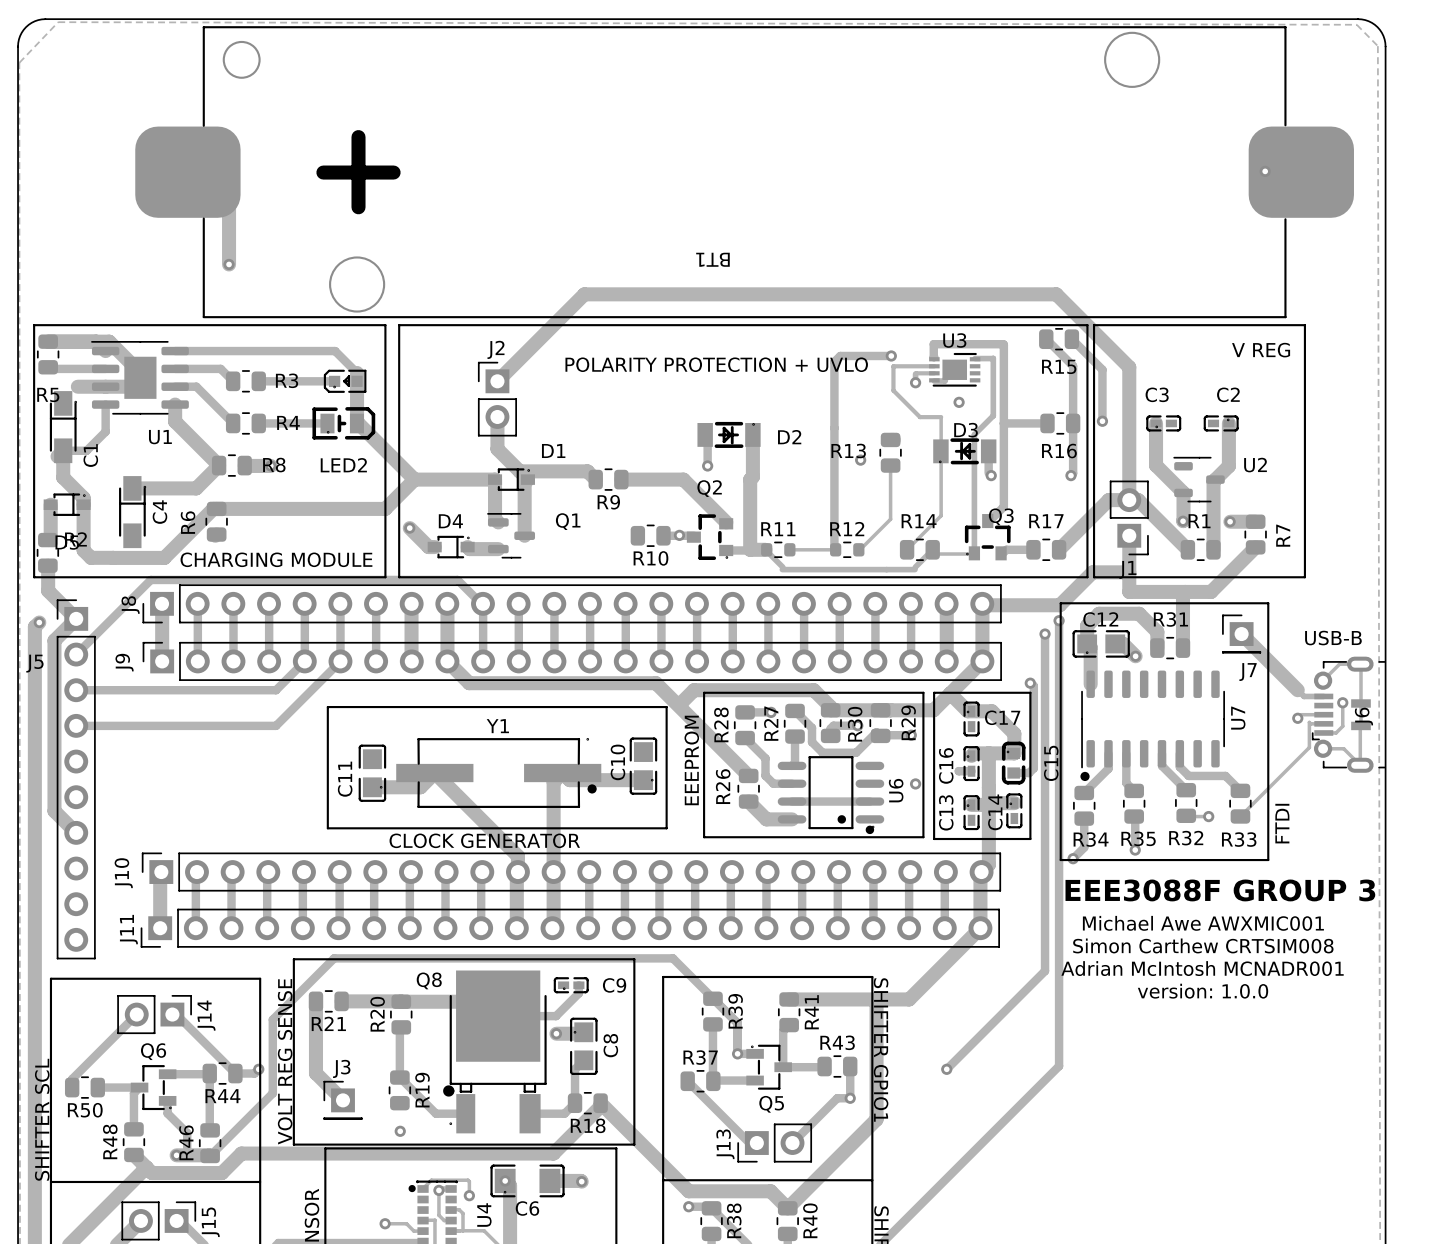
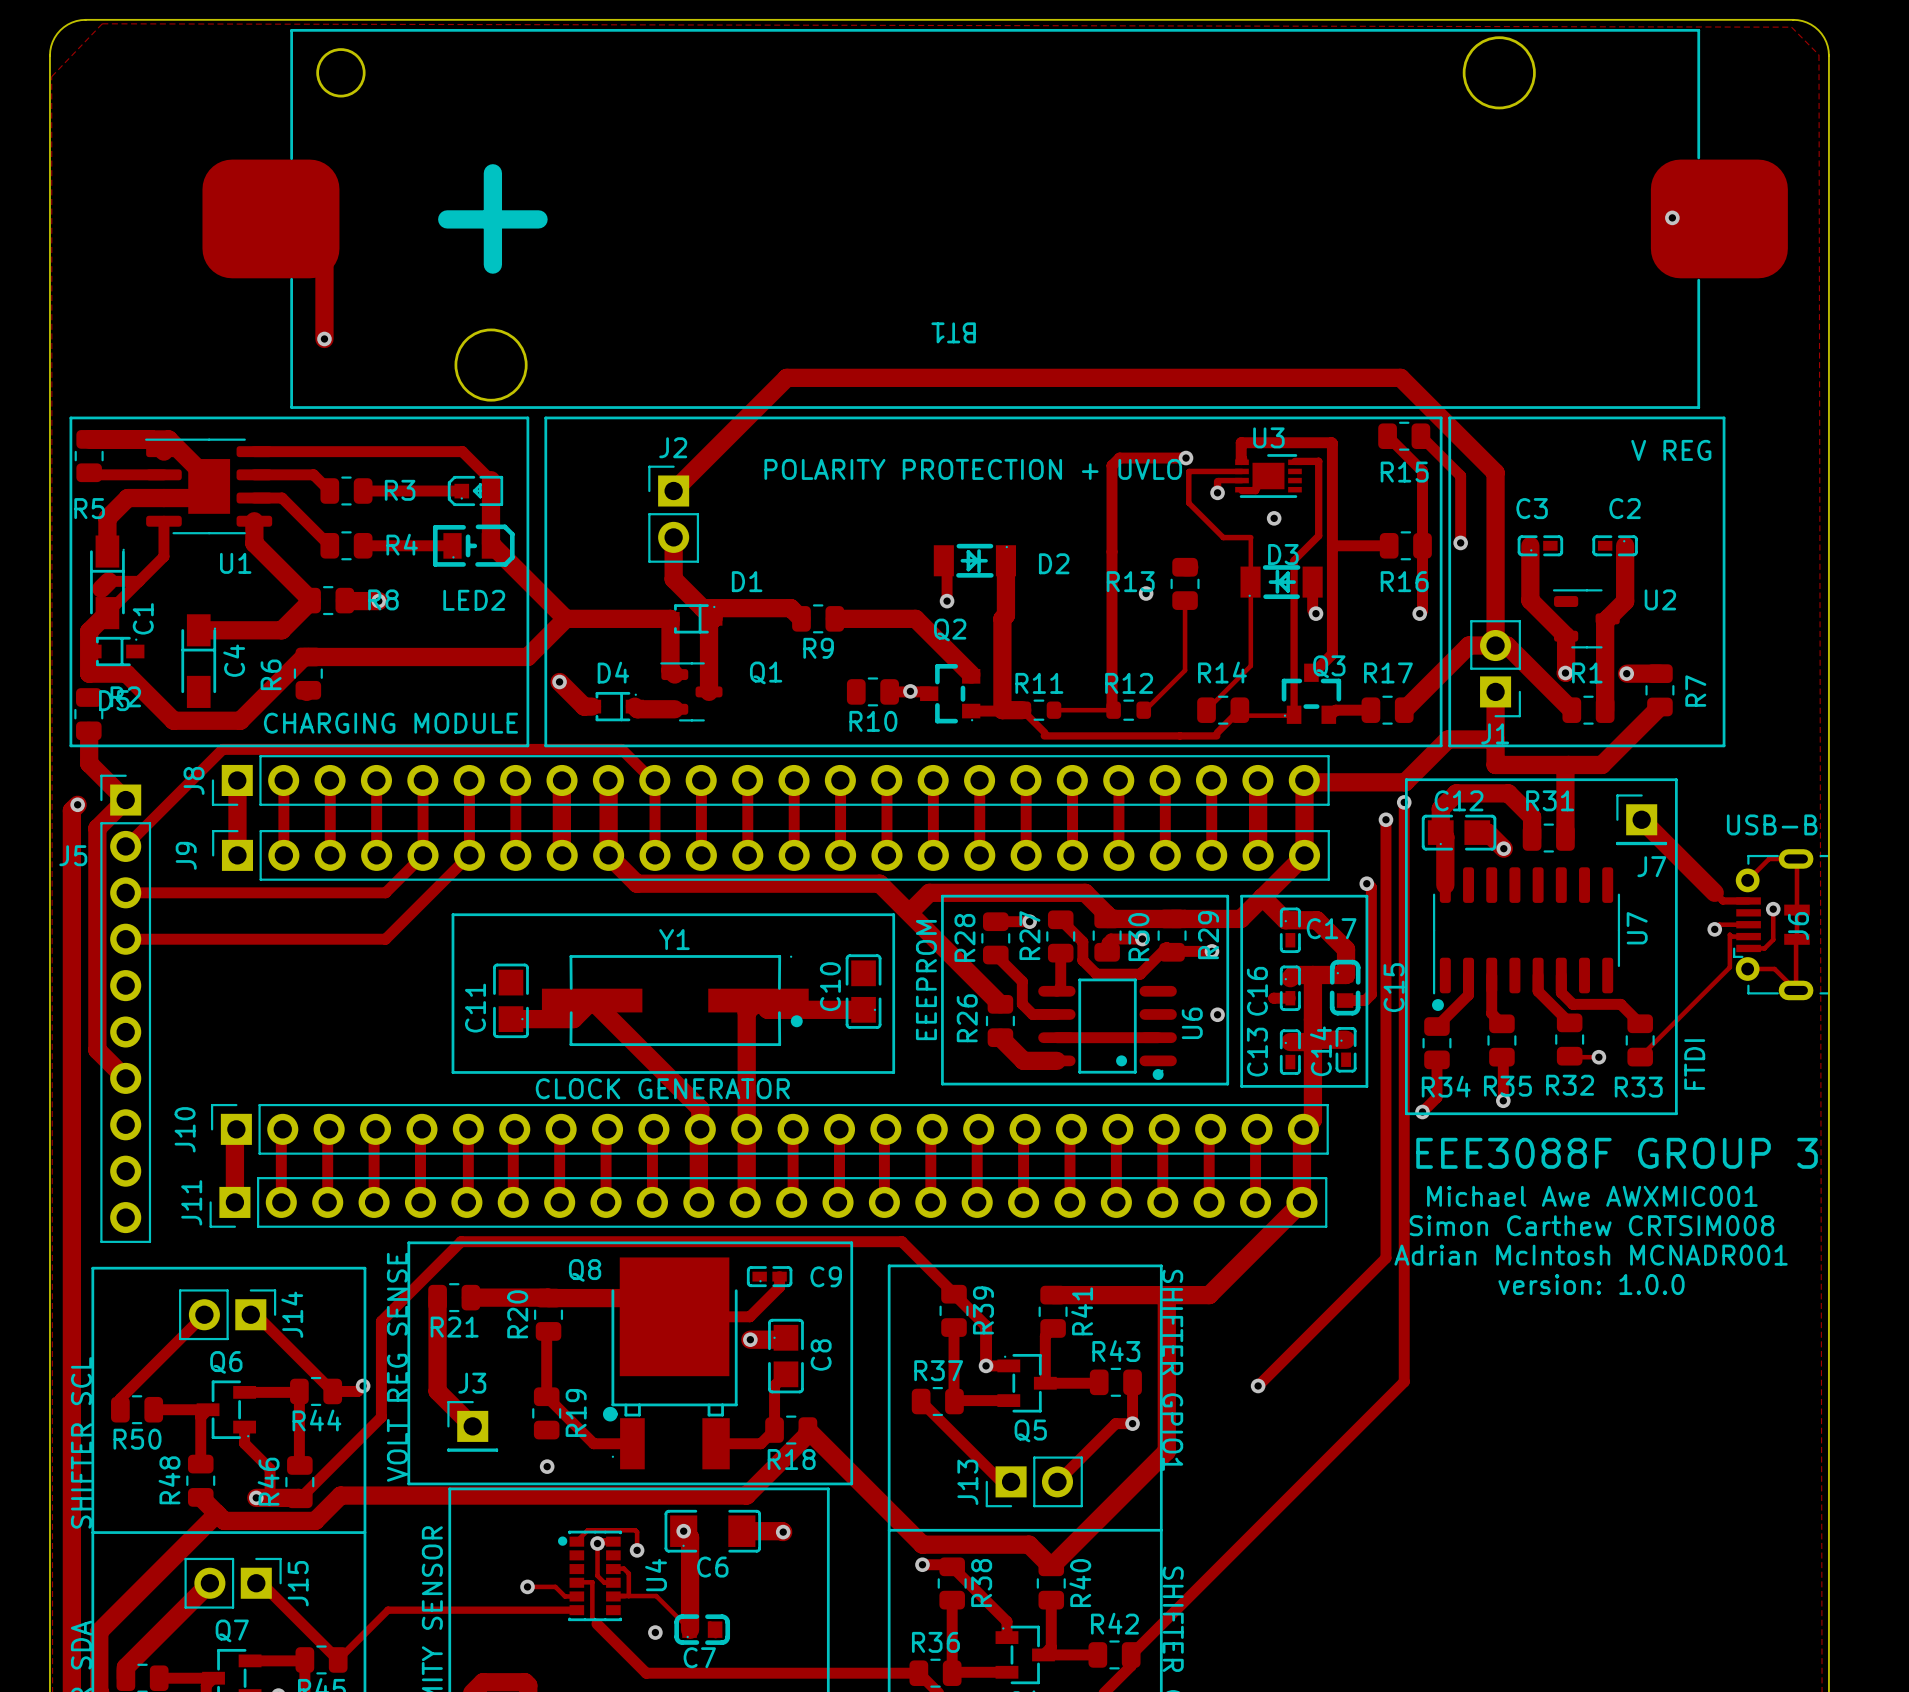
track: none -> (127, 498) (107, 518) (107, 551)
C1 position: (63, 427) -> (107, 582)
track: (63, 450) (63, 477) (83, 497) (83, 550) (91, 557) (113, 557) -> (139, 581) (89, 631) (89, 673) (126, 673) (173, 720)
track: (50, 504) (50, 537) (47, 540) -> none

